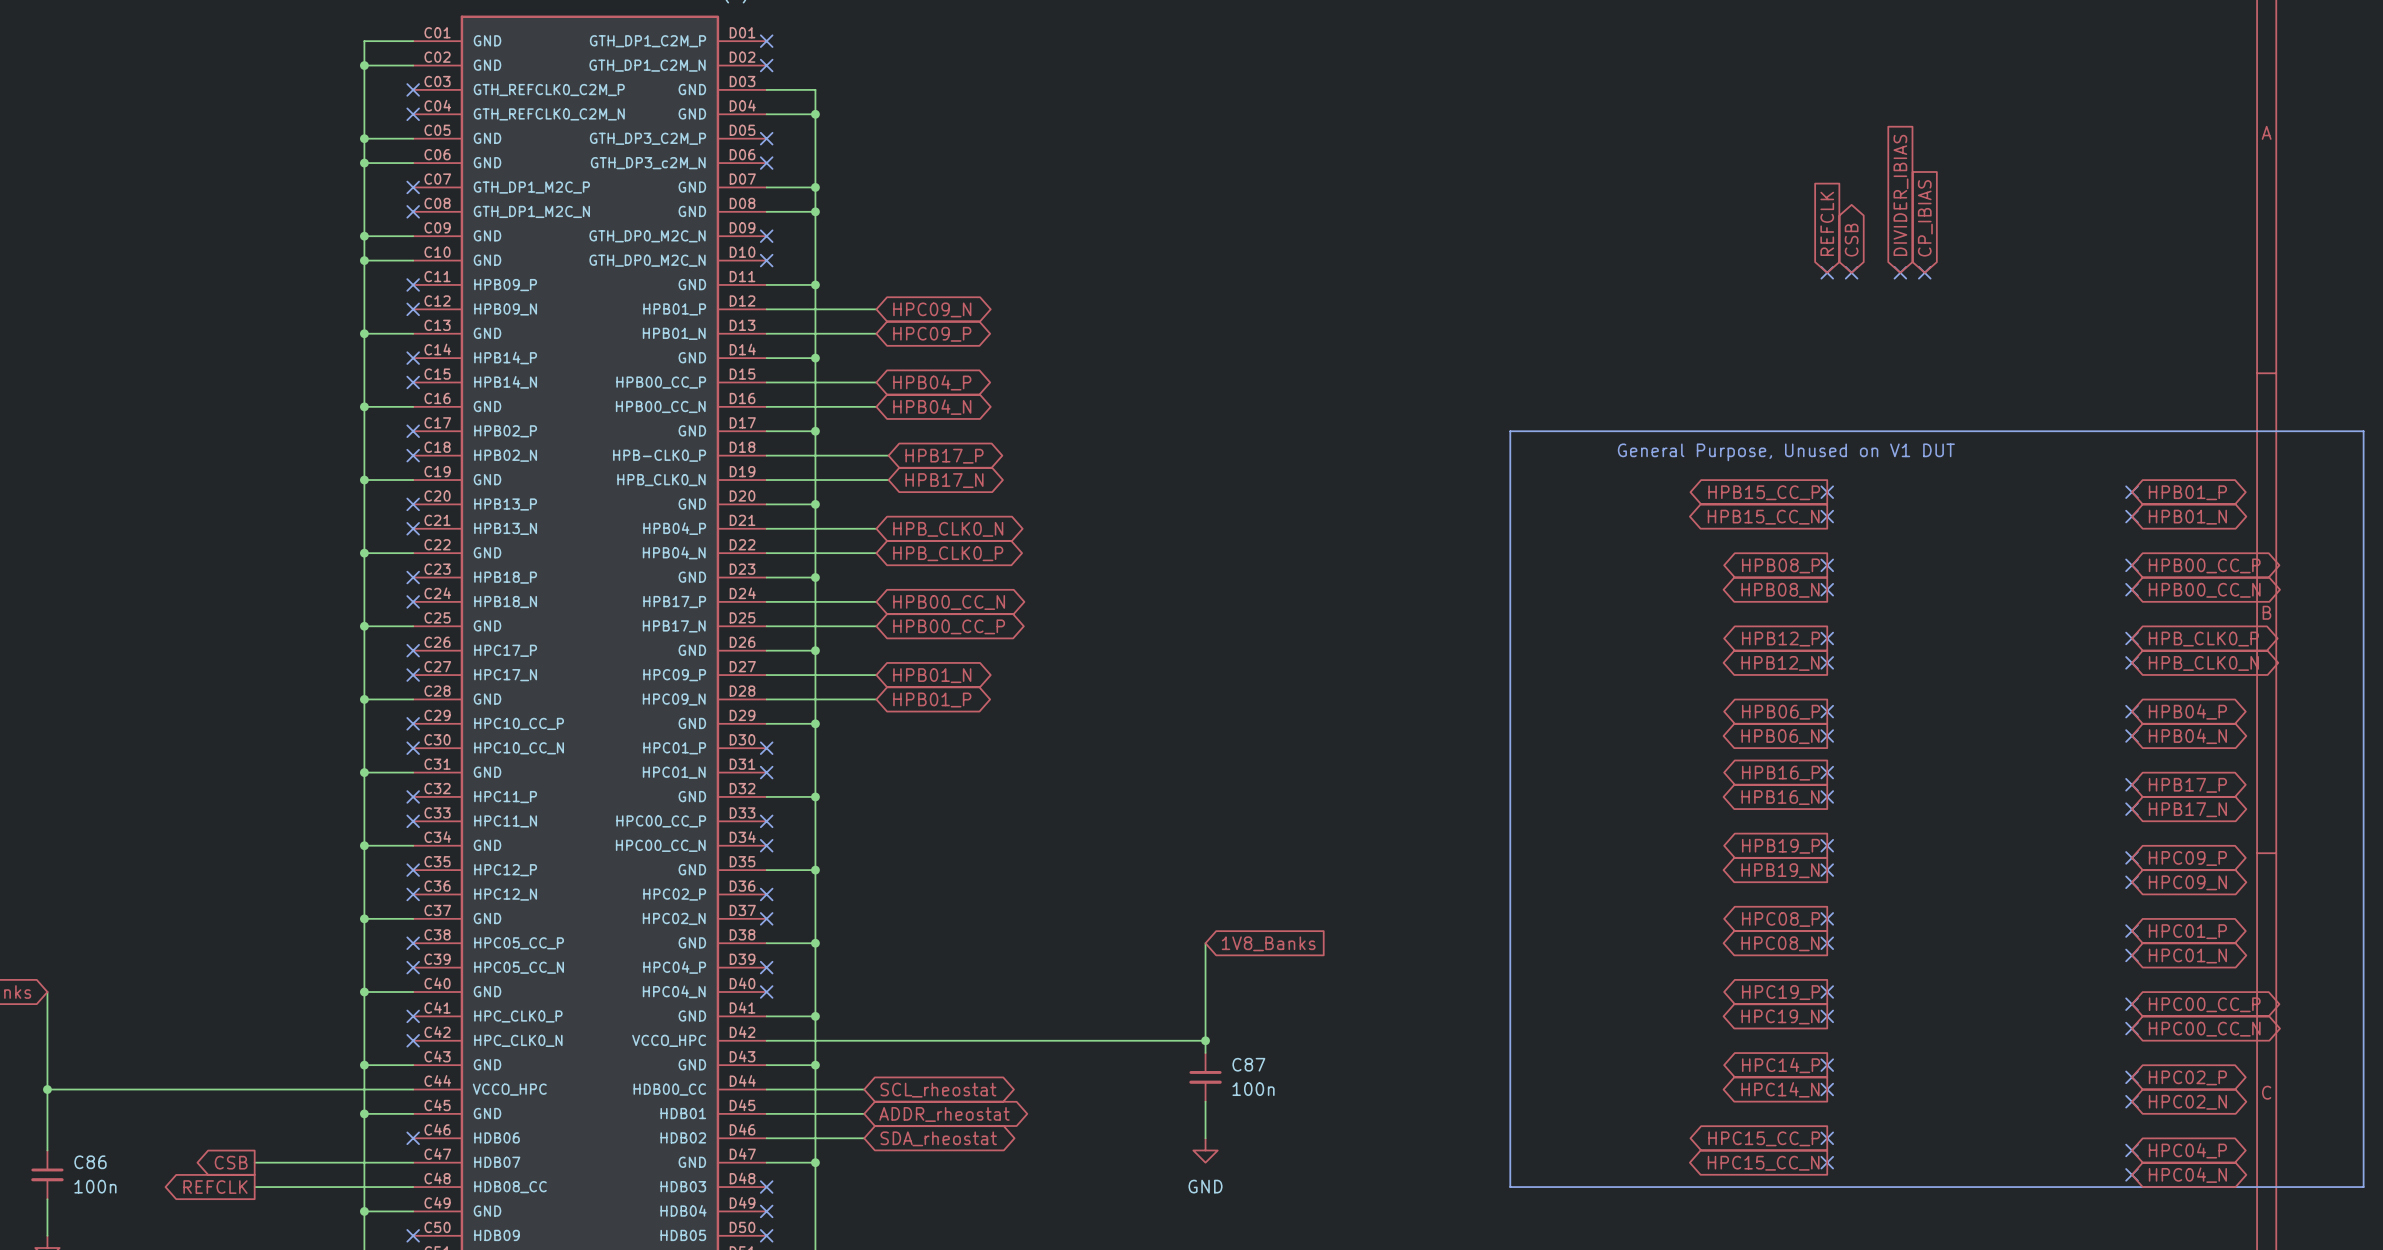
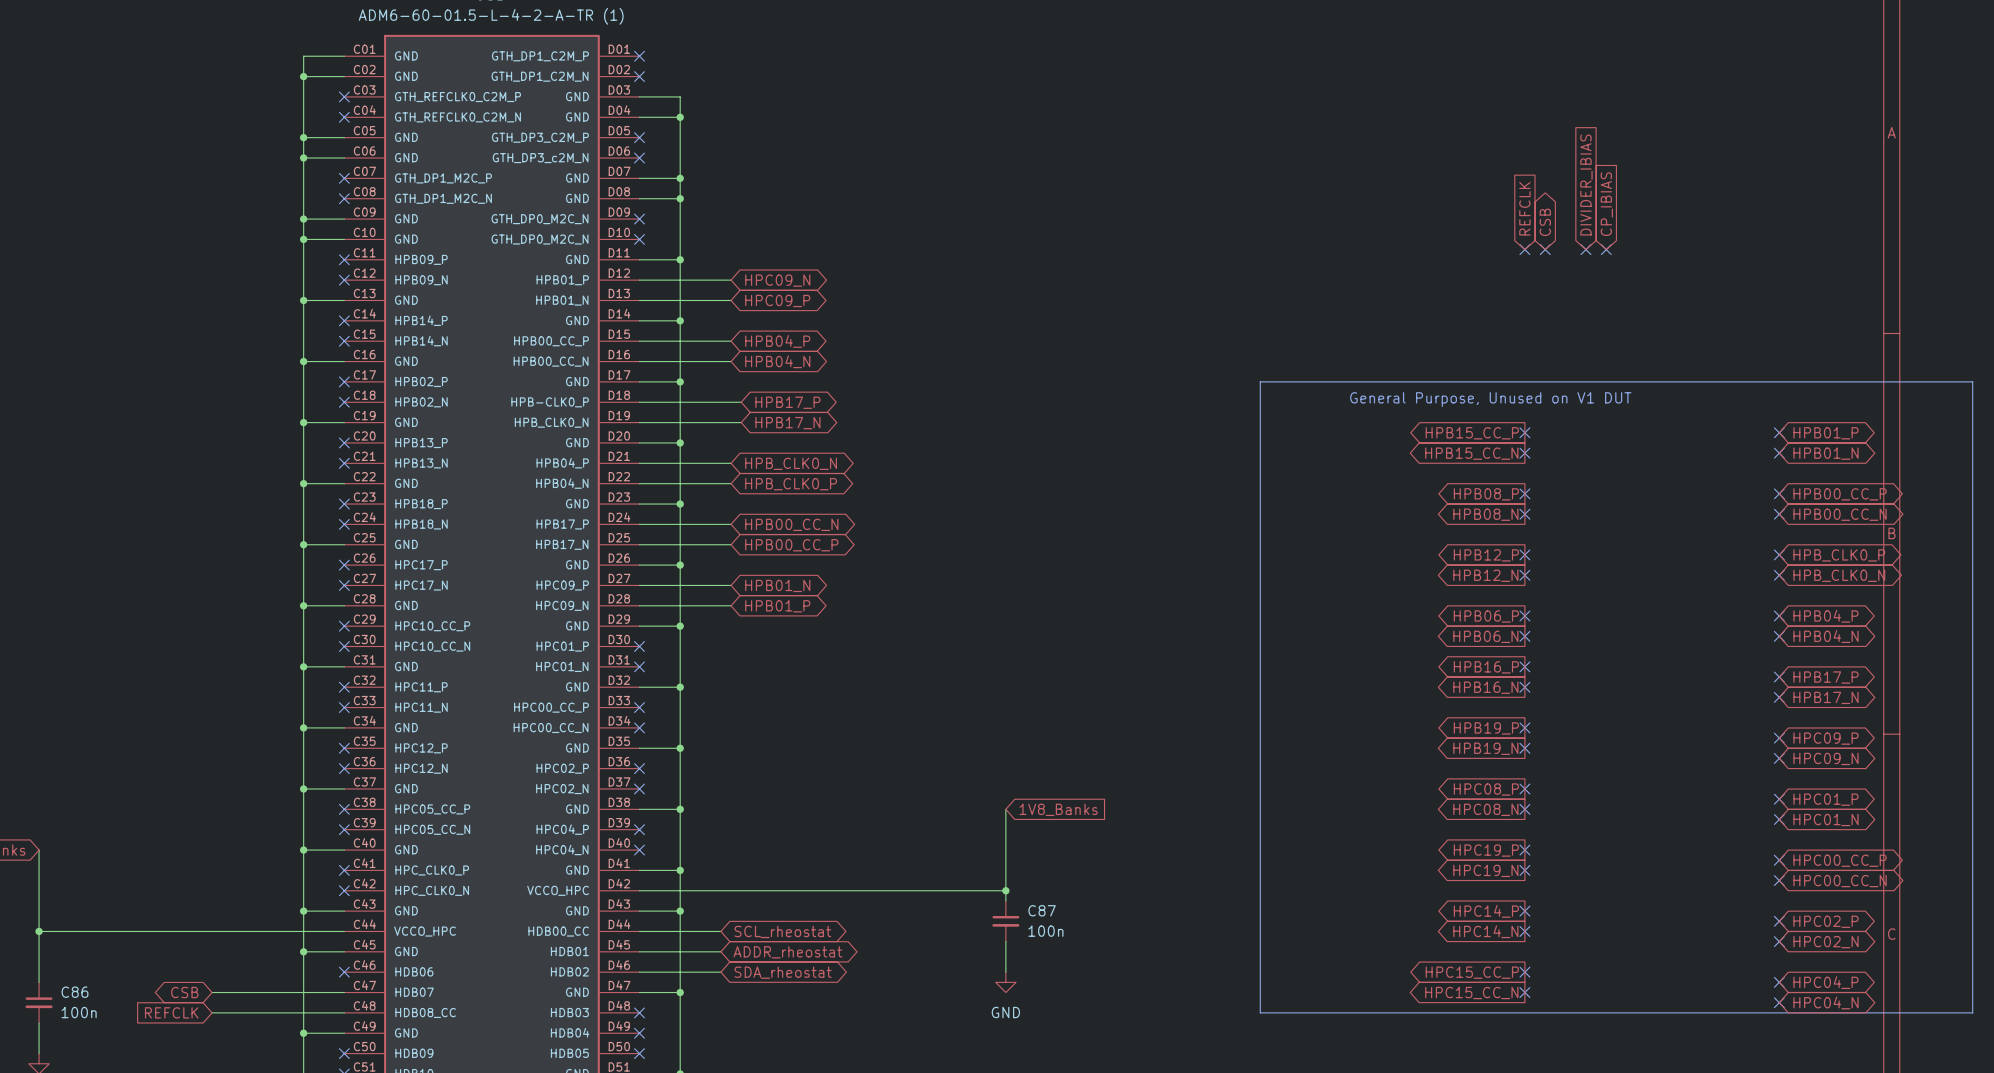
global label shape: output (231, 1162) -> bidirectional (184, 992)
global label shape: output (215, 1187) -> input (171, 1012)

